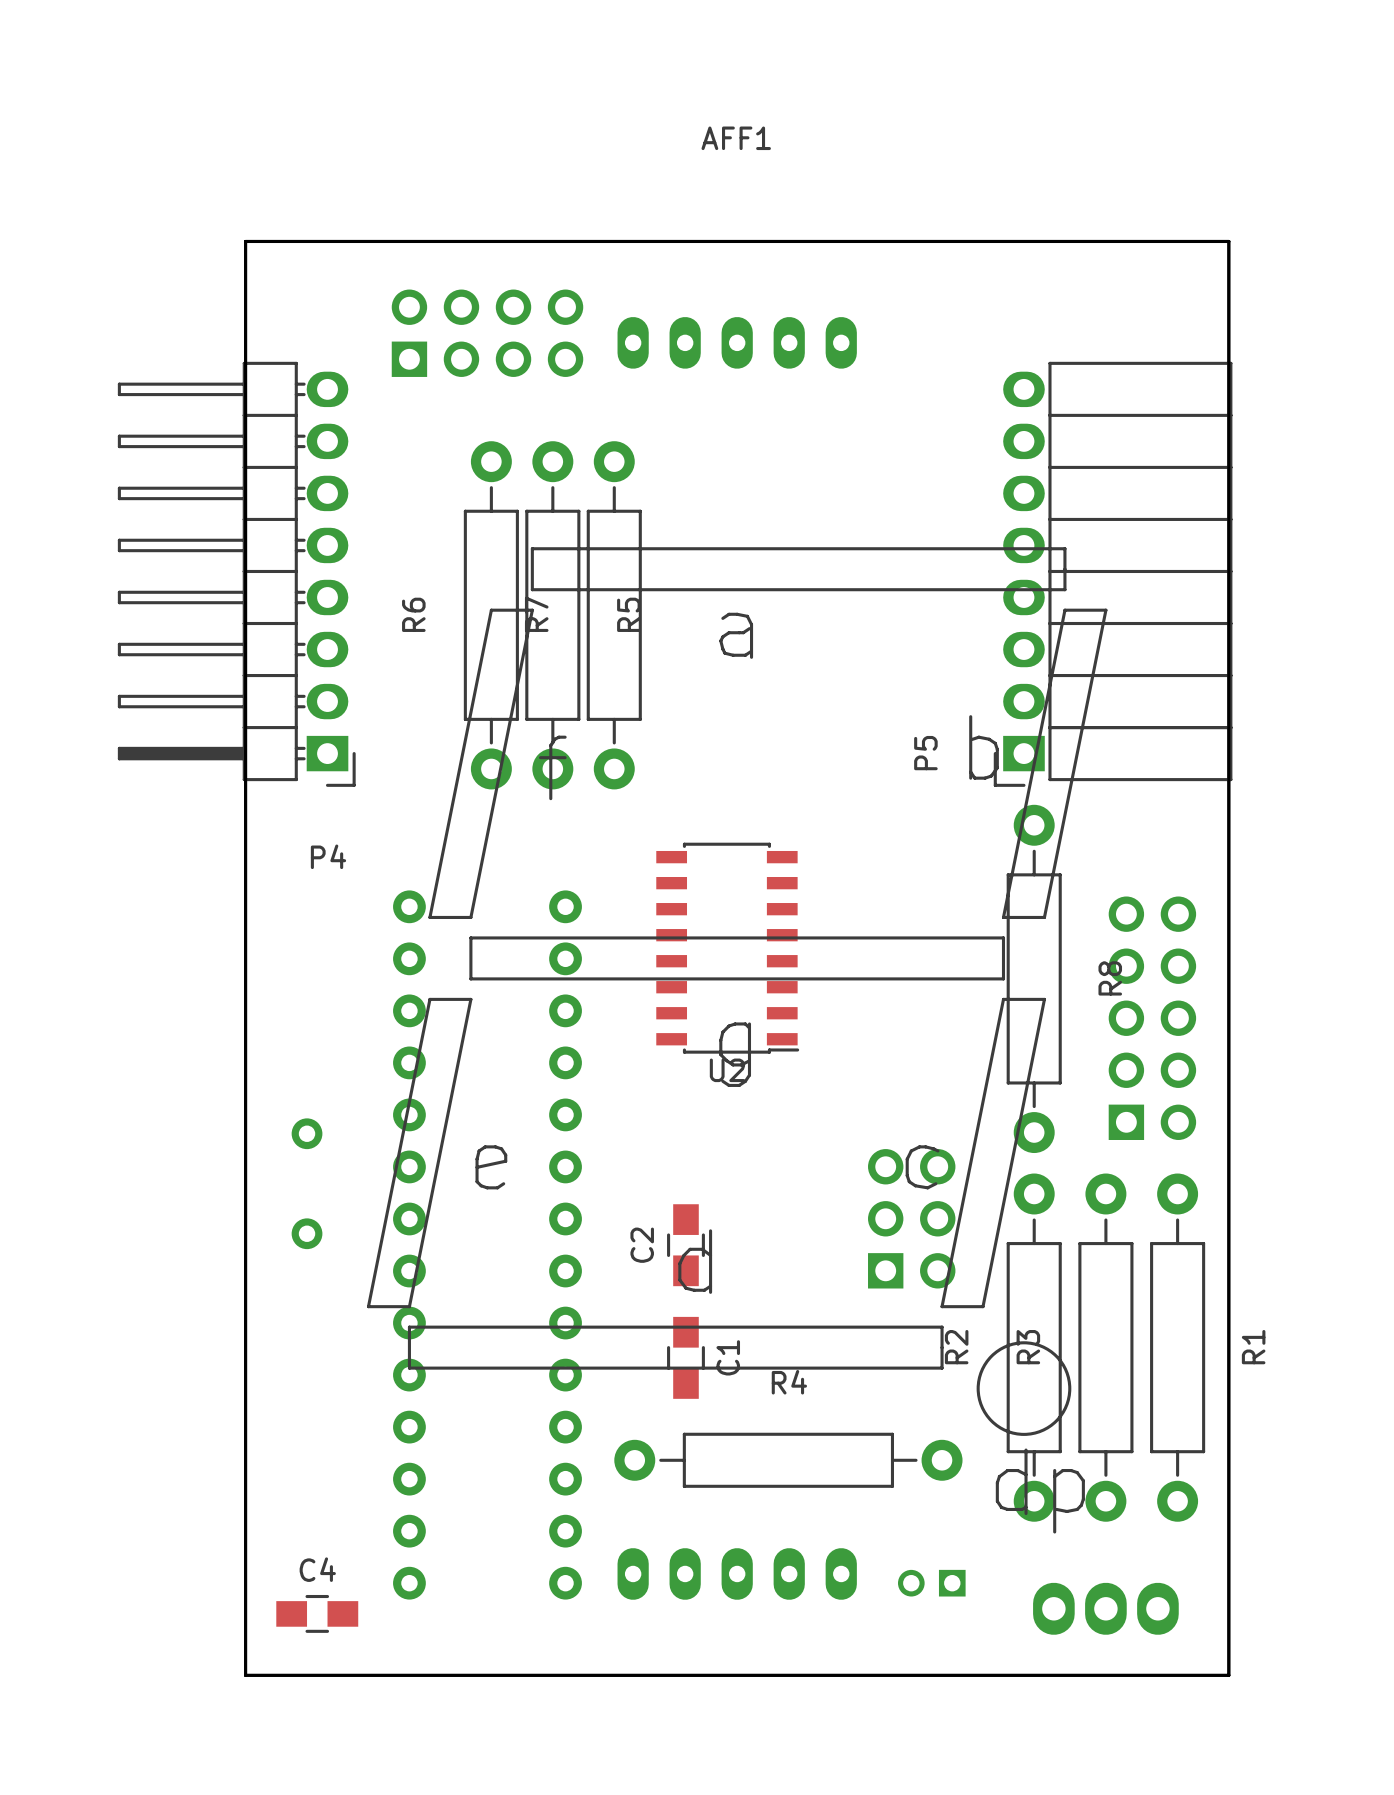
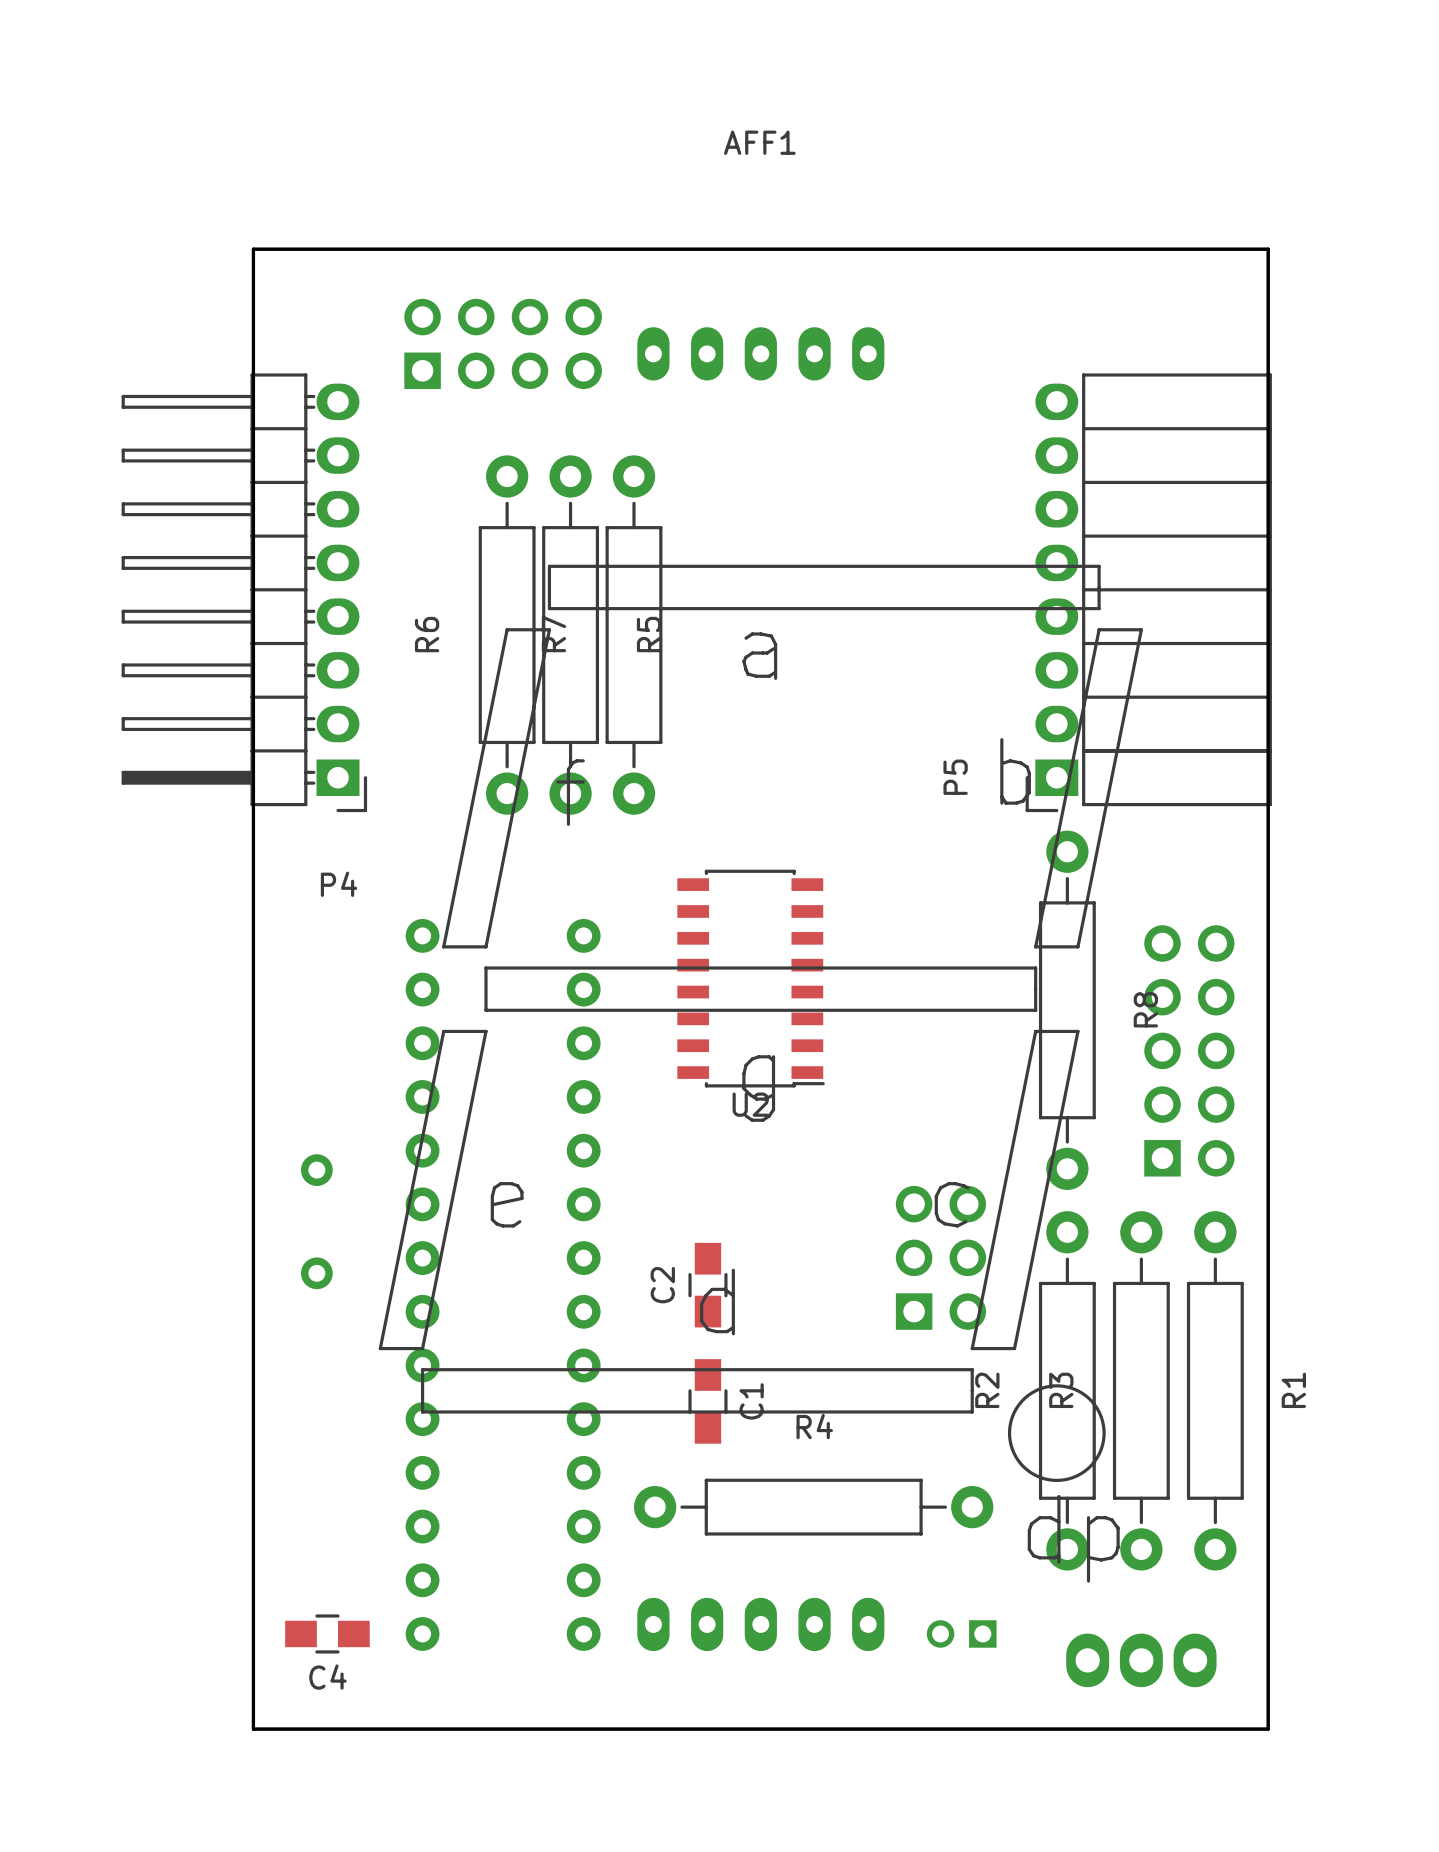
C4 name position: C4 (317, 1569) -> C4 (327, 1677)
C4 position: (317, 1613) -> (327, 1633)

